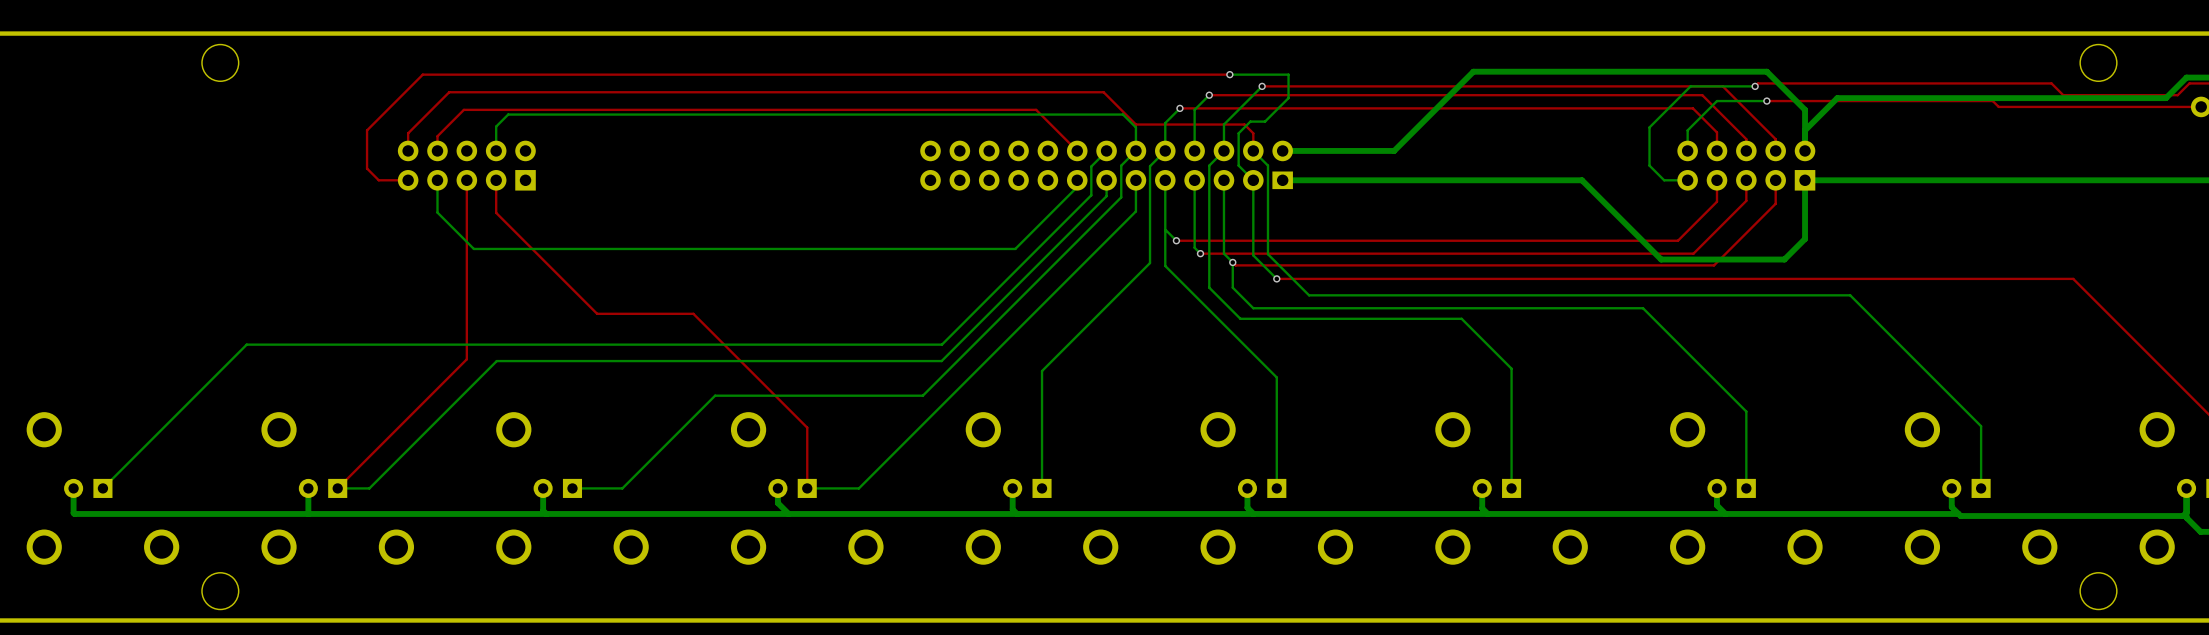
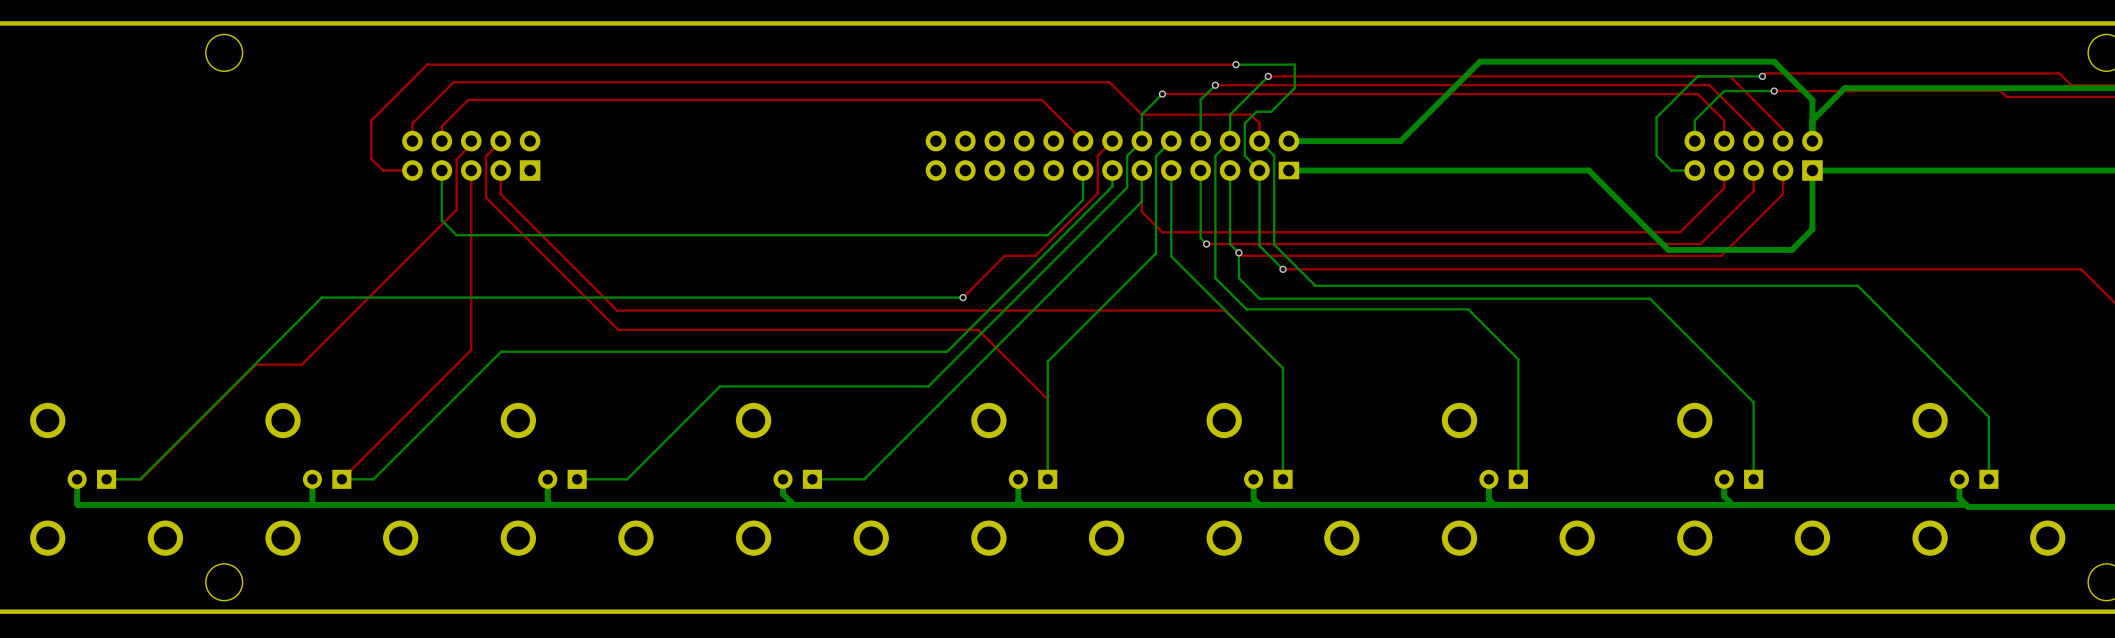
top track: (1179, 108) (1692, 108) (1716, 132) -> (1162, 94) (1697, 94) (1724, 122)
bottom track: (1179, 108) (1165, 123) (1165, 150) -> none
via position: (1179, 108) -> (1162, 94)
bottom track: (1135, 127) (1123, 114) (508, 114) (496, 126) (496, 150) -> (1141, 117) (1141, 114) (1162, 94)
top track: none -> (471, 141) (471, 144) (456, 159) (456, 209) (301, 364) (255, 364) (141, 479) (106, 479)
top track: none -> (500, 141) (485, 156) (485, 197) (618, 329) (978, 329) (1047, 399) (1047, 479)
top track: none -> (1112, 141) (1097, 155) (1097, 193) (1035, 255) (1004, 255) (963, 297)
bottom track: (1106, 150) (1091, 166) (1091, 195) (941, 344) (246, 344) (102, 488) -> (963, 297) (321, 297) (140, 479) (106, 479)
bottom track: (1077, 187) (1015, 248) (473, 248) (437, 212) -> (1083, 177) (1083, 199) (1047, 235) (456, 235) (441, 220) (441, 202)
top track: (1716, 197) (1716, 201) (1677, 240) (1176, 240) -> (1724, 188) (1680, 232) (1162, 232) (1141, 211) (1141, 170)
top track: (496, 203) (496, 212) (597, 313) (693, 313) (807, 427) (807, 488) -> (500, 194) (617, 310) (1224, 310) (1283, 368) (1283, 479)
bottom track: (1165, 230) (1176, 240) -> none
via: (1176, 240) -> none
via: none -> (963, 297)

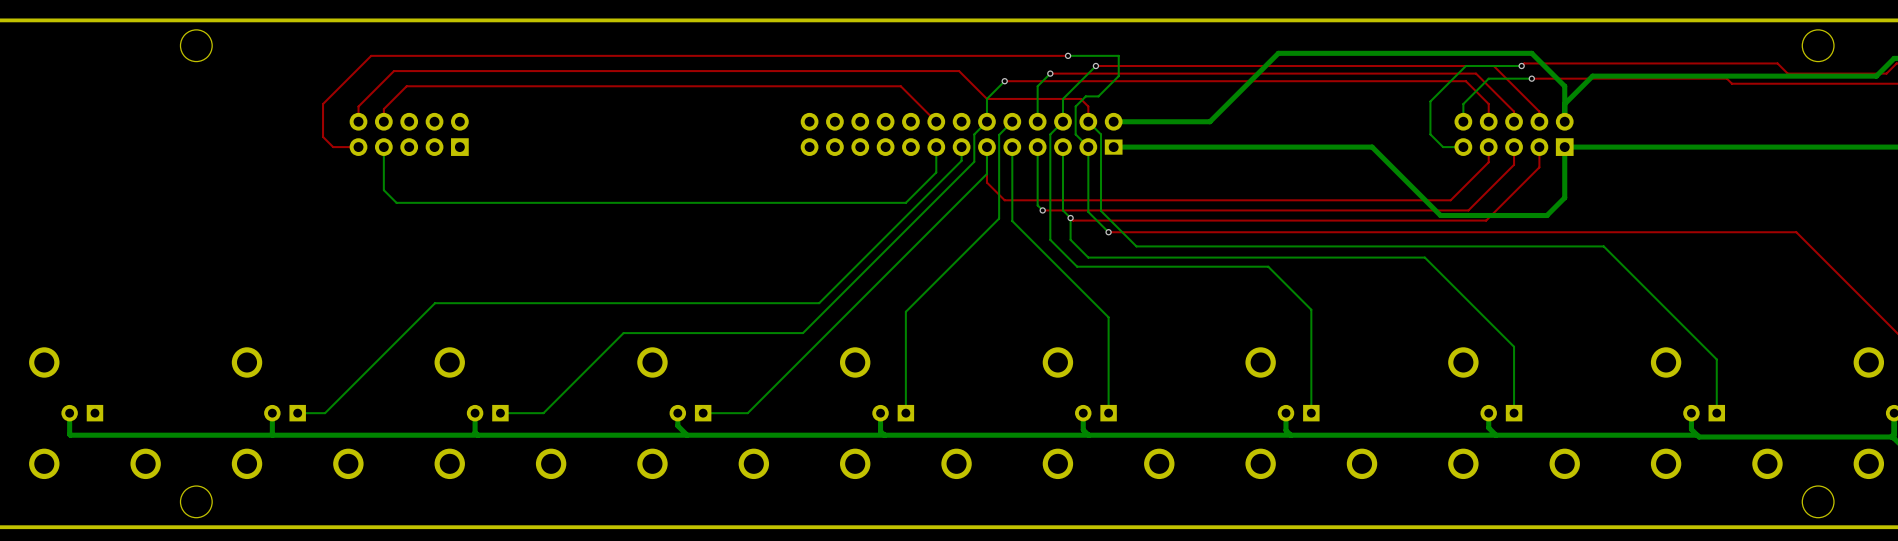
top track: (471, 141) (471, 144) (456, 159) (456, 209) (301, 364) (255, 364) (141, 479) (106, 479) -> none
top track: (500, 141) (485, 156) (485, 197) (618, 329) (978, 329) (1047, 399) (1047, 479) -> none
top track: (1112, 141) (1097, 155) (1097, 193) (1035, 255) (1004, 255) (963, 297) -> none
top track: (471, 170) (471, 349) (341, 479) -> none
top track: (500, 170) (500, 194) (617, 310) (1224, 310) (1283, 368) (1283, 479) -> none
bottom track: (963, 297) (321, 297) (140, 479) (106, 479) -> none
via: (963, 297) -> none

